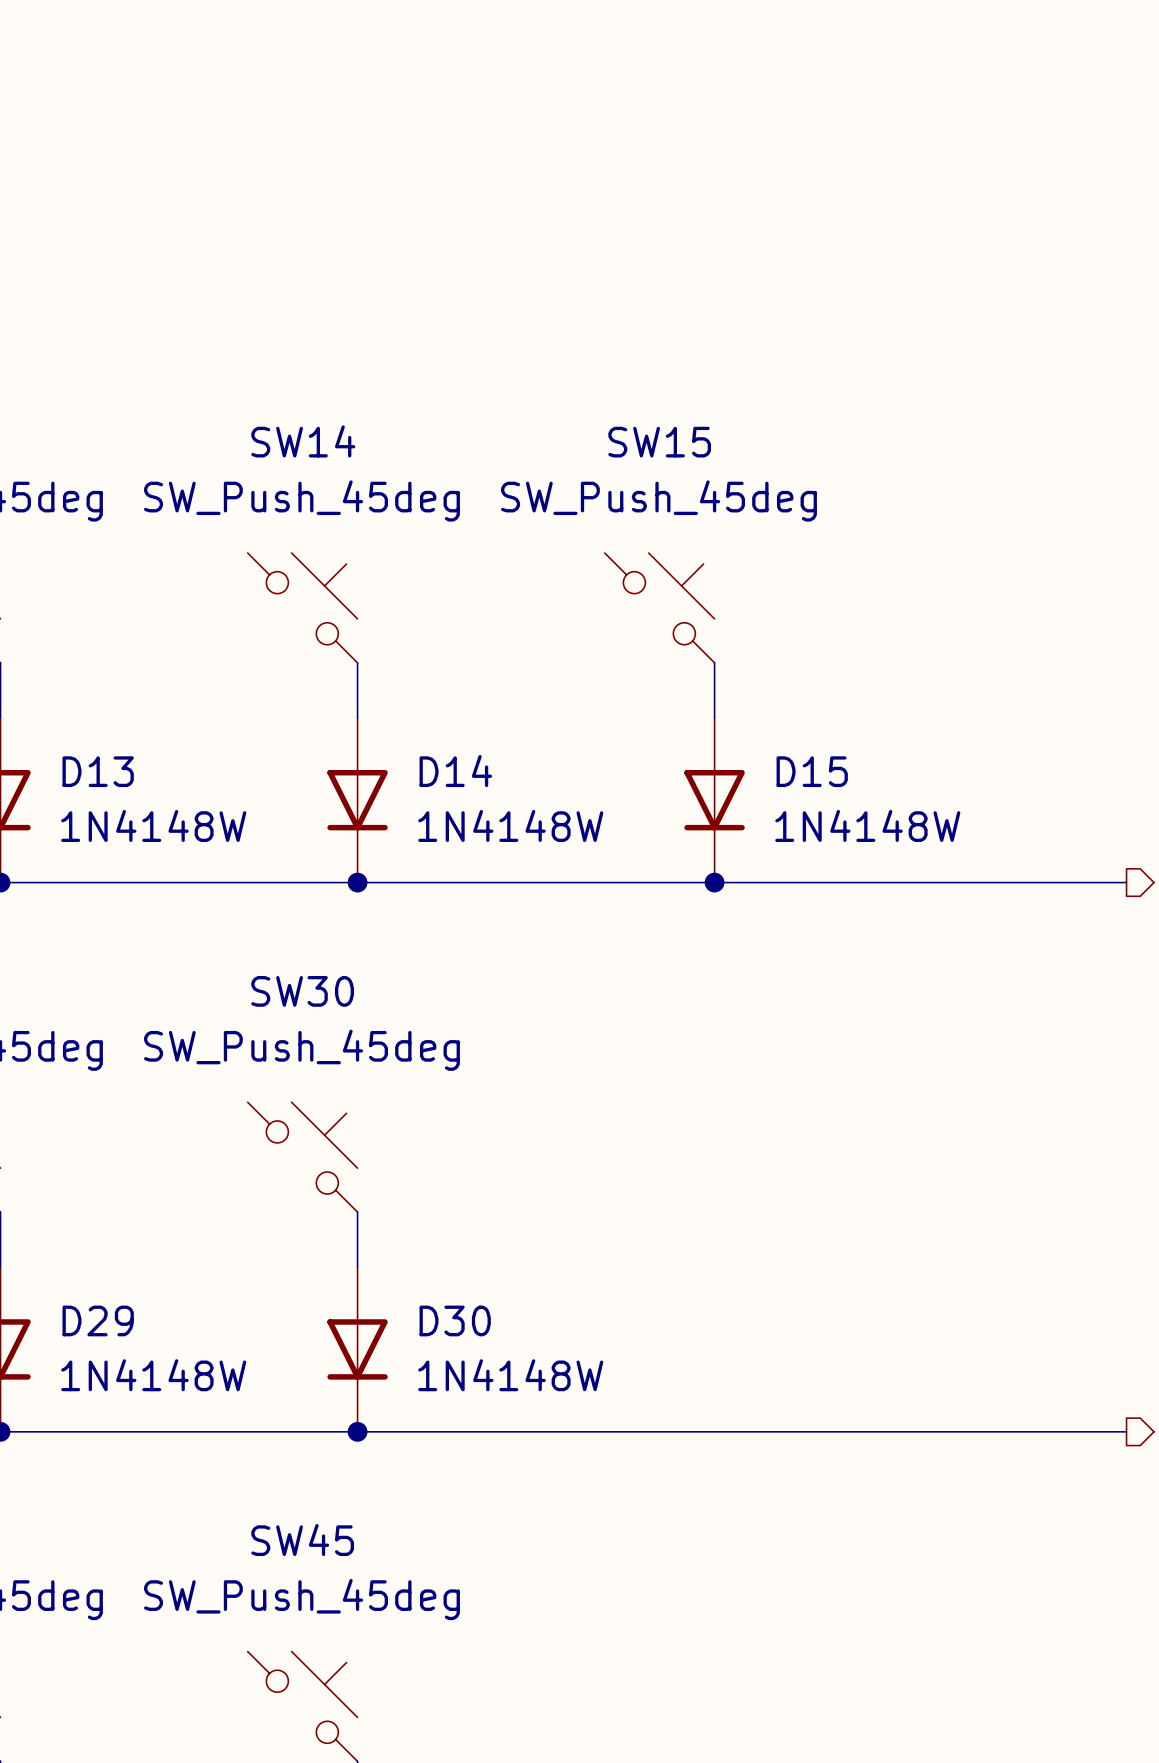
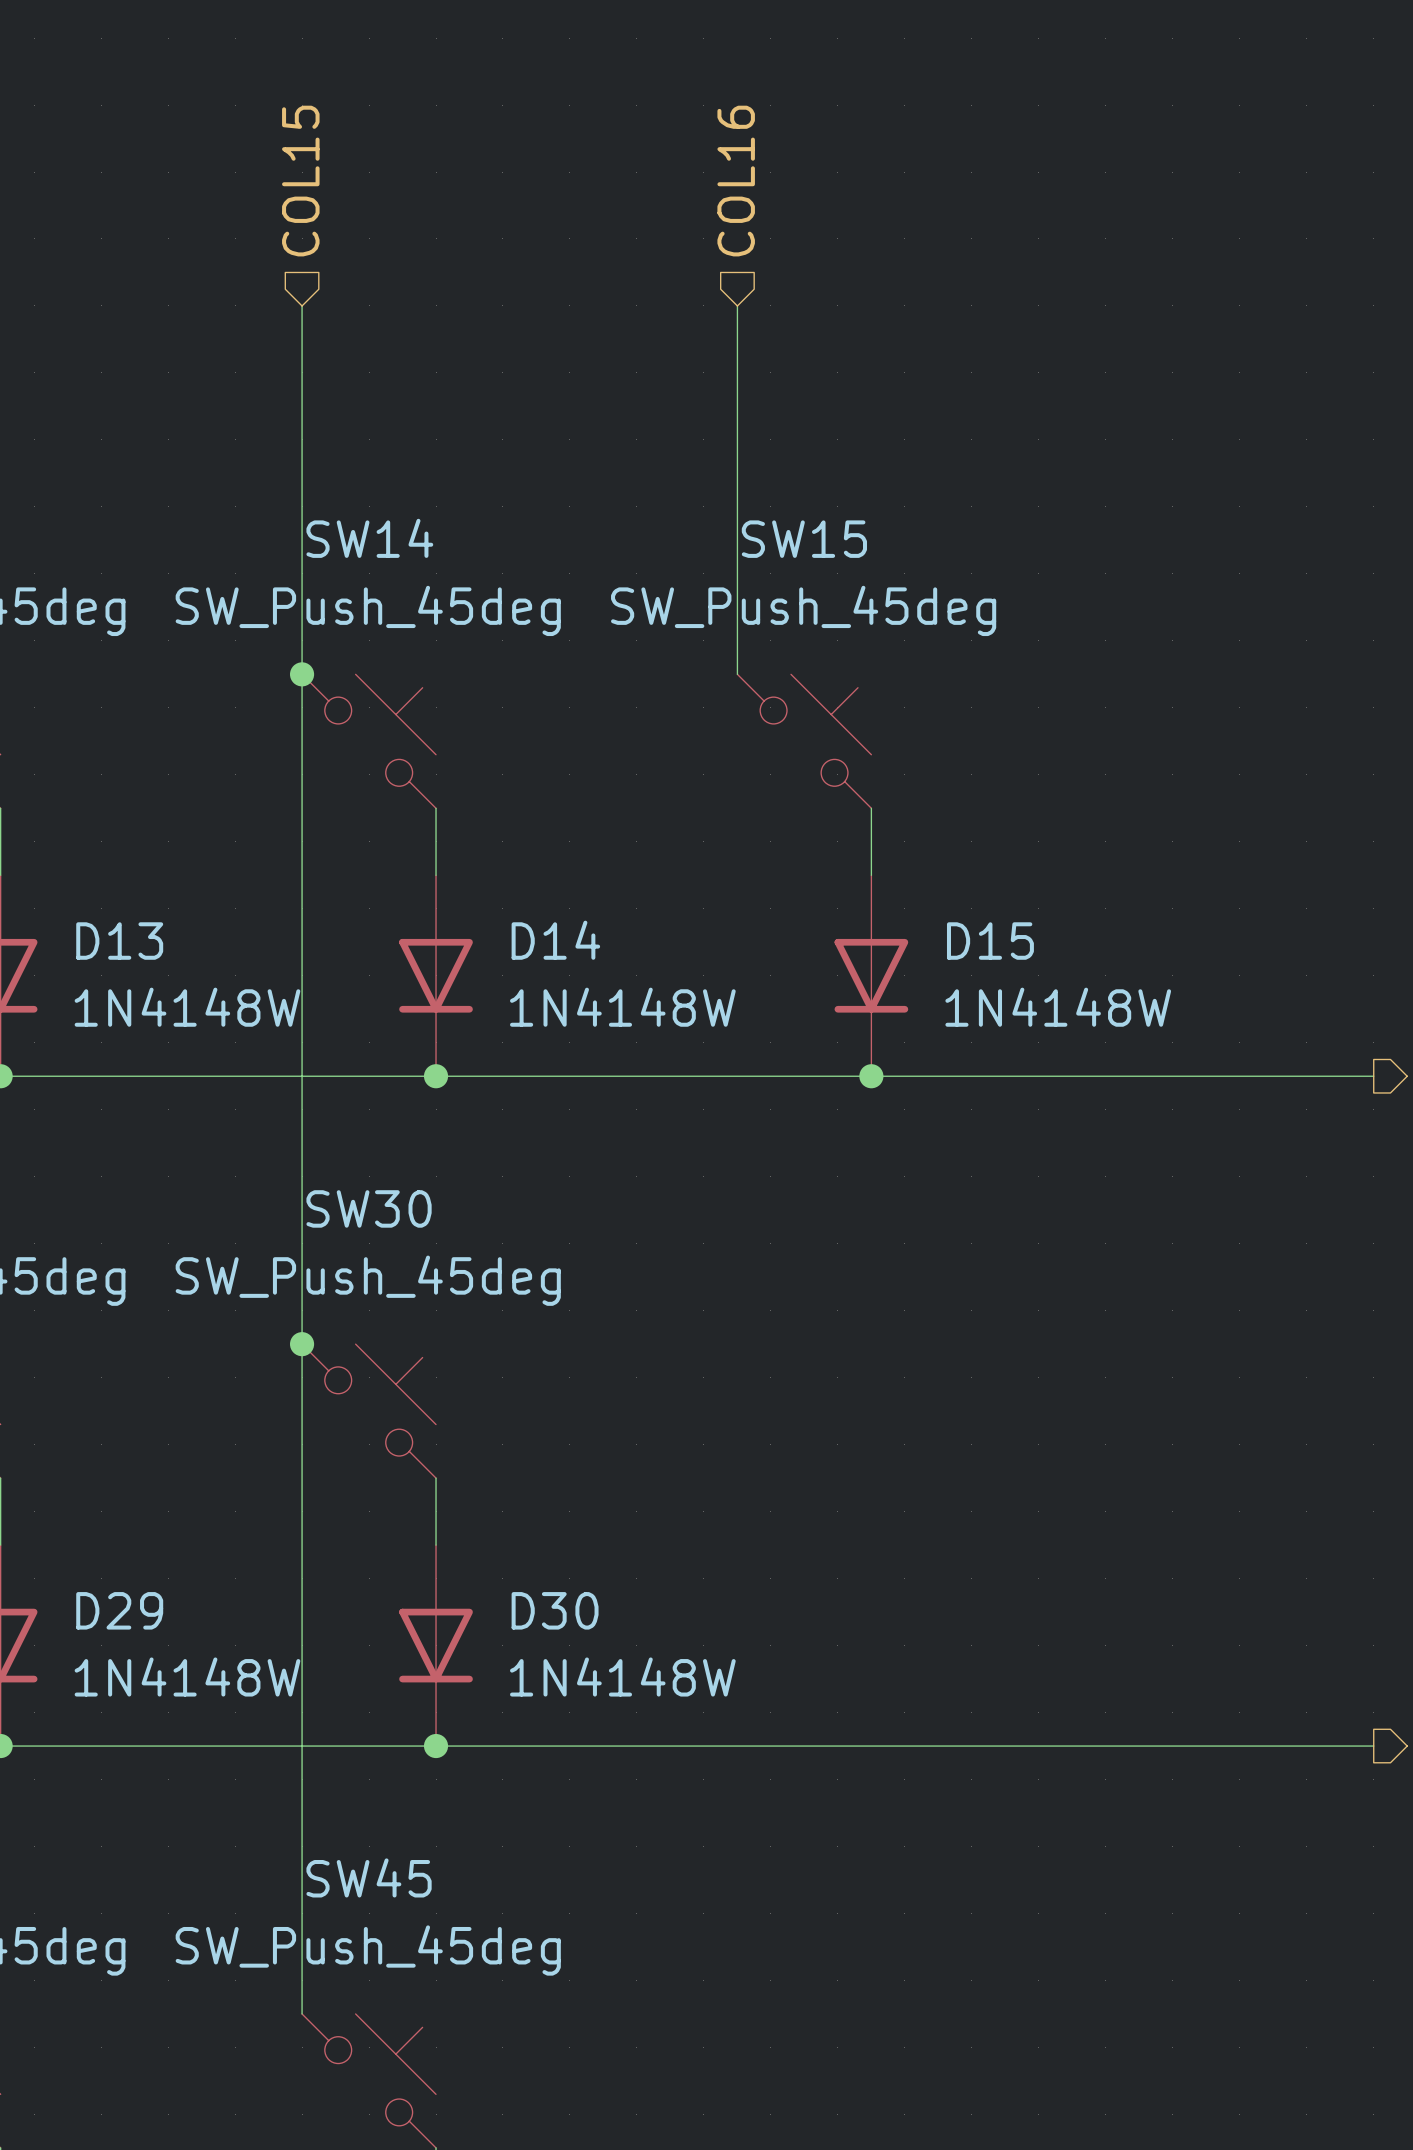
hierarchical label: none -> COL15 (300, 181)
hierarchical label: none -> COL16 (736, 181)
wire: none -> (302, 305) (302, 2013)
wire: none -> (737, 305) (737, 674)
junction: none -> (302, 674)
junction: none -> (302, 1344)

